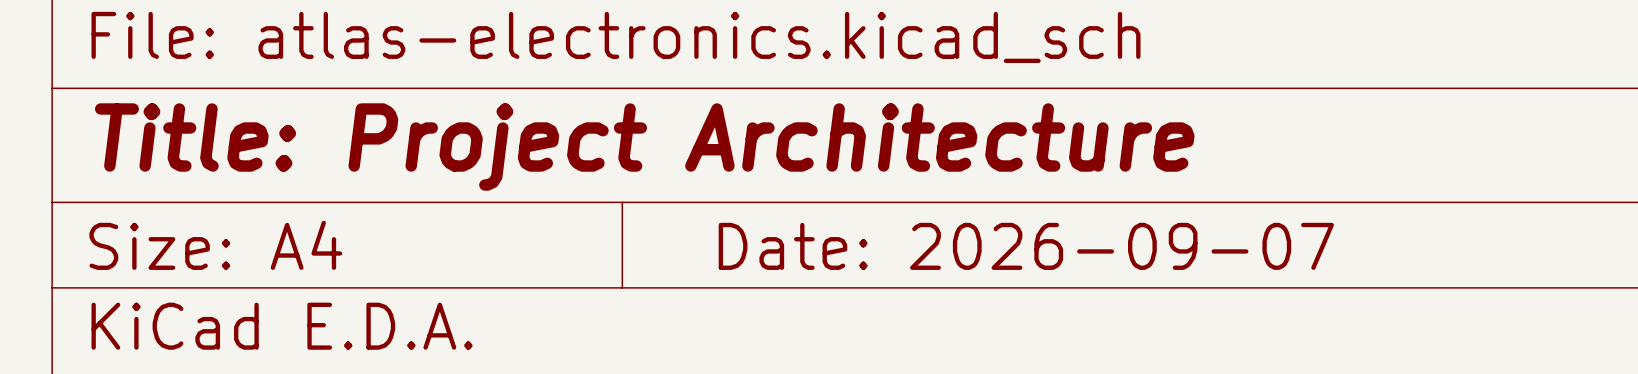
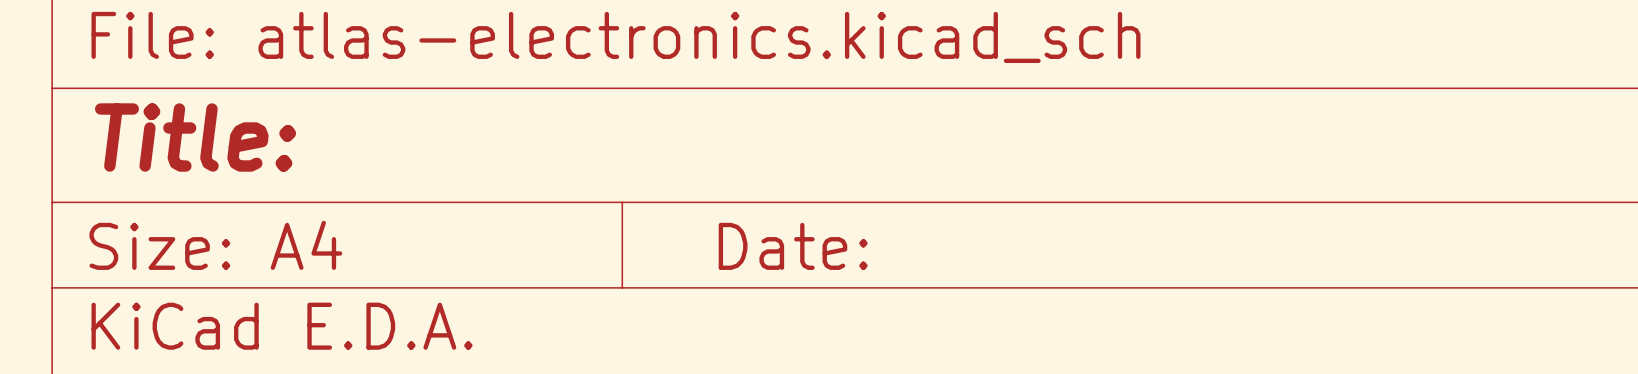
title block: Title: Project Architecture (644, 147) -> Title: (195, 137)
title block: Date: 2026-09-07 (1026, 246) -> Date: (793, 246)

